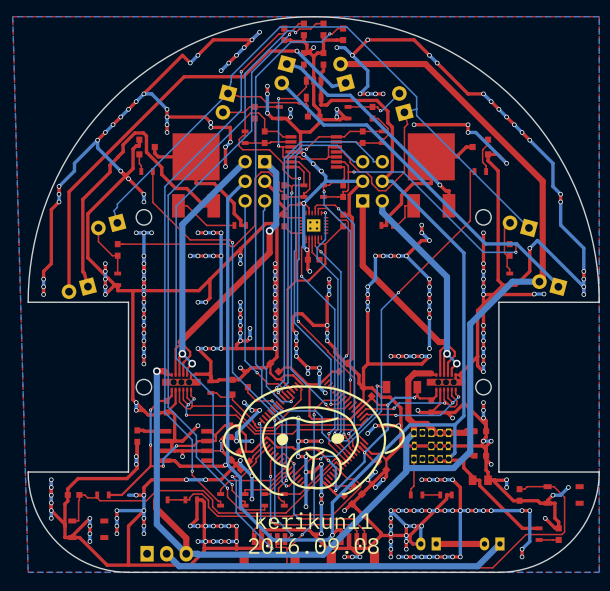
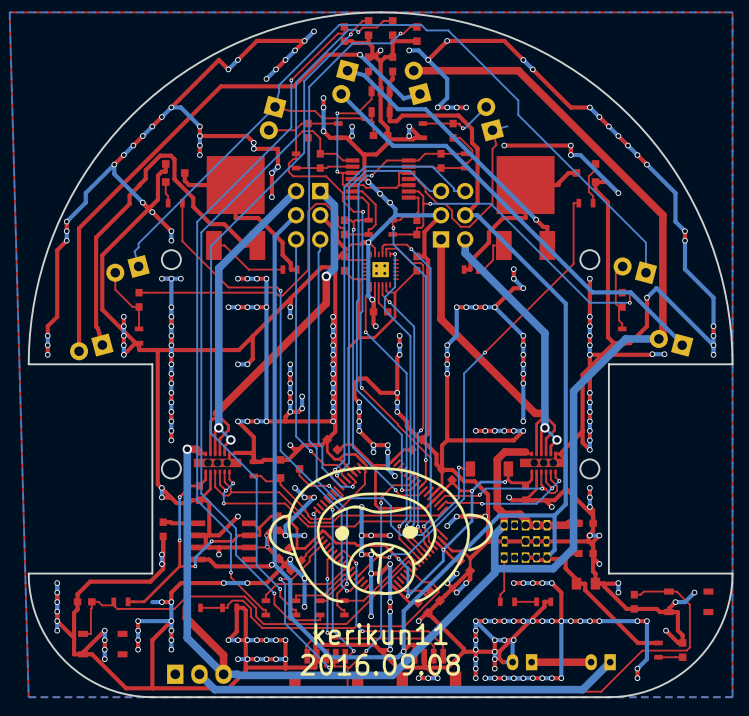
bottom track: (351, 31) (416, 96) (416, 115) (528, 227) -> (426, 30) (448, 30) (518, 100) (518, 115) (645, 242) (645, 272)

